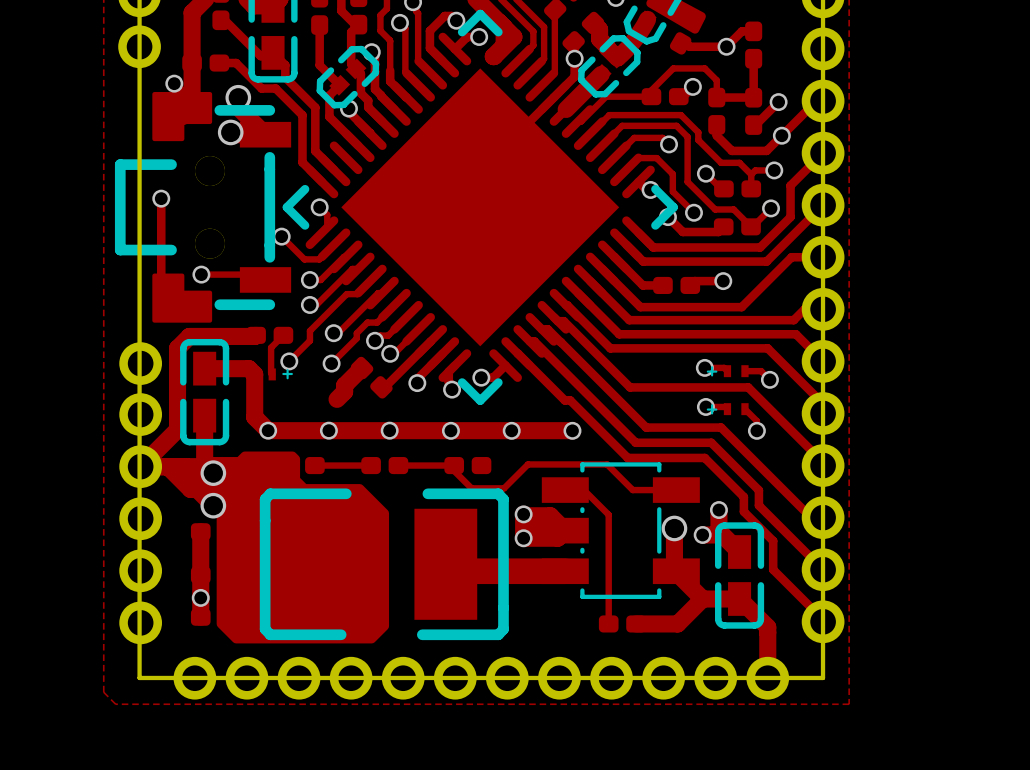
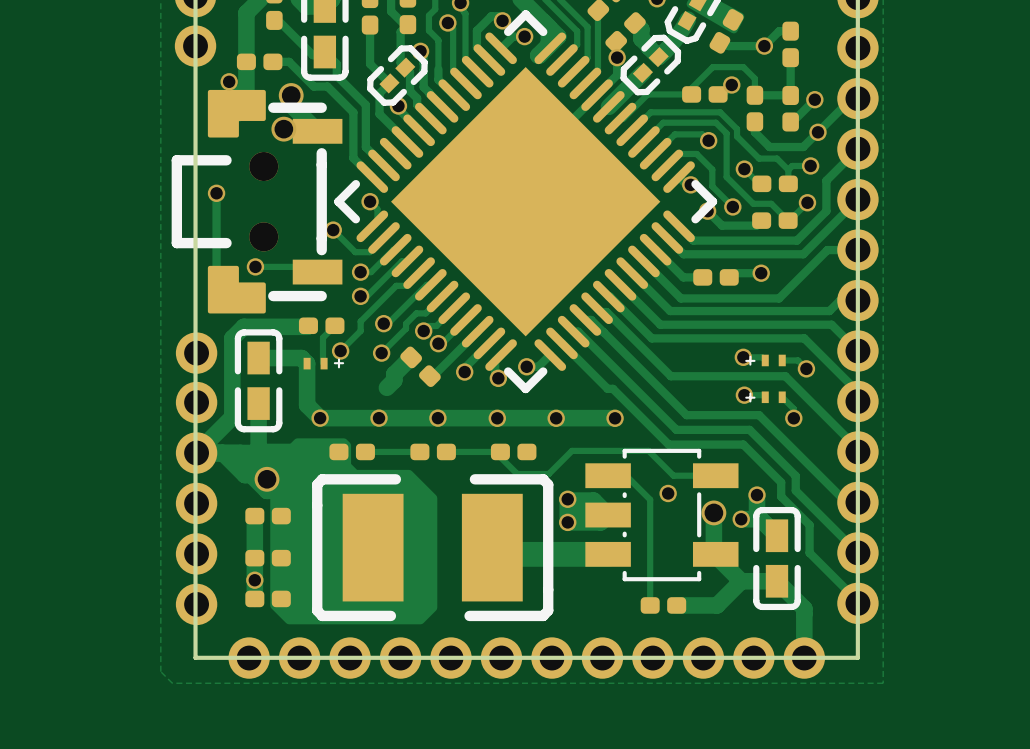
via: (213, 473) -> none
via: none -> (267, 479)
via: (213, 505) -> none
via: none -> (668, 493)

